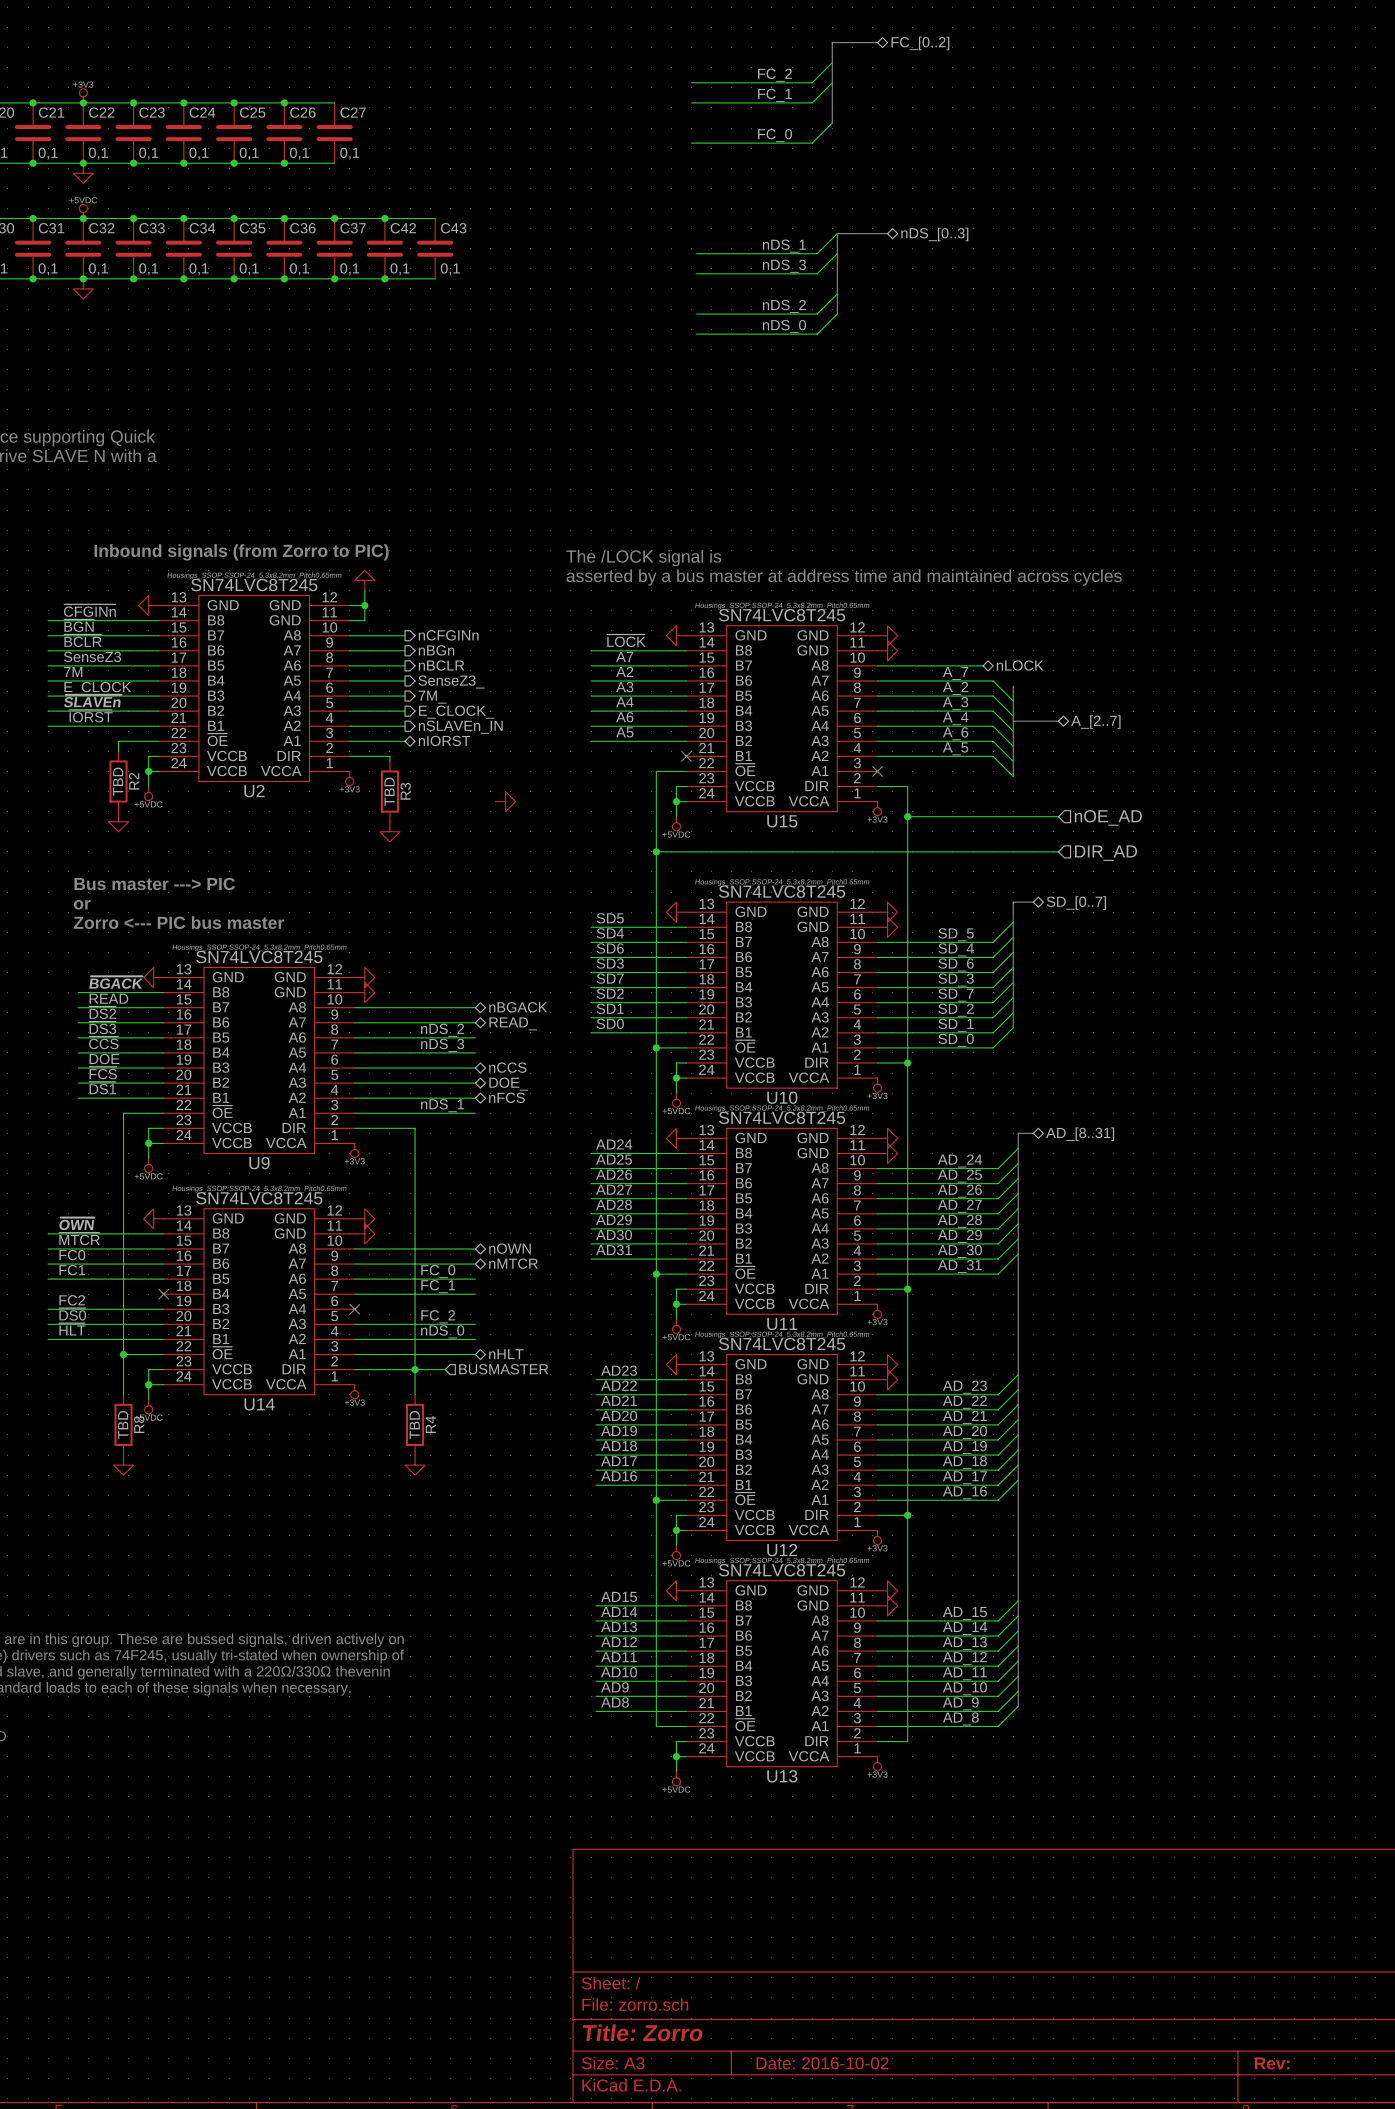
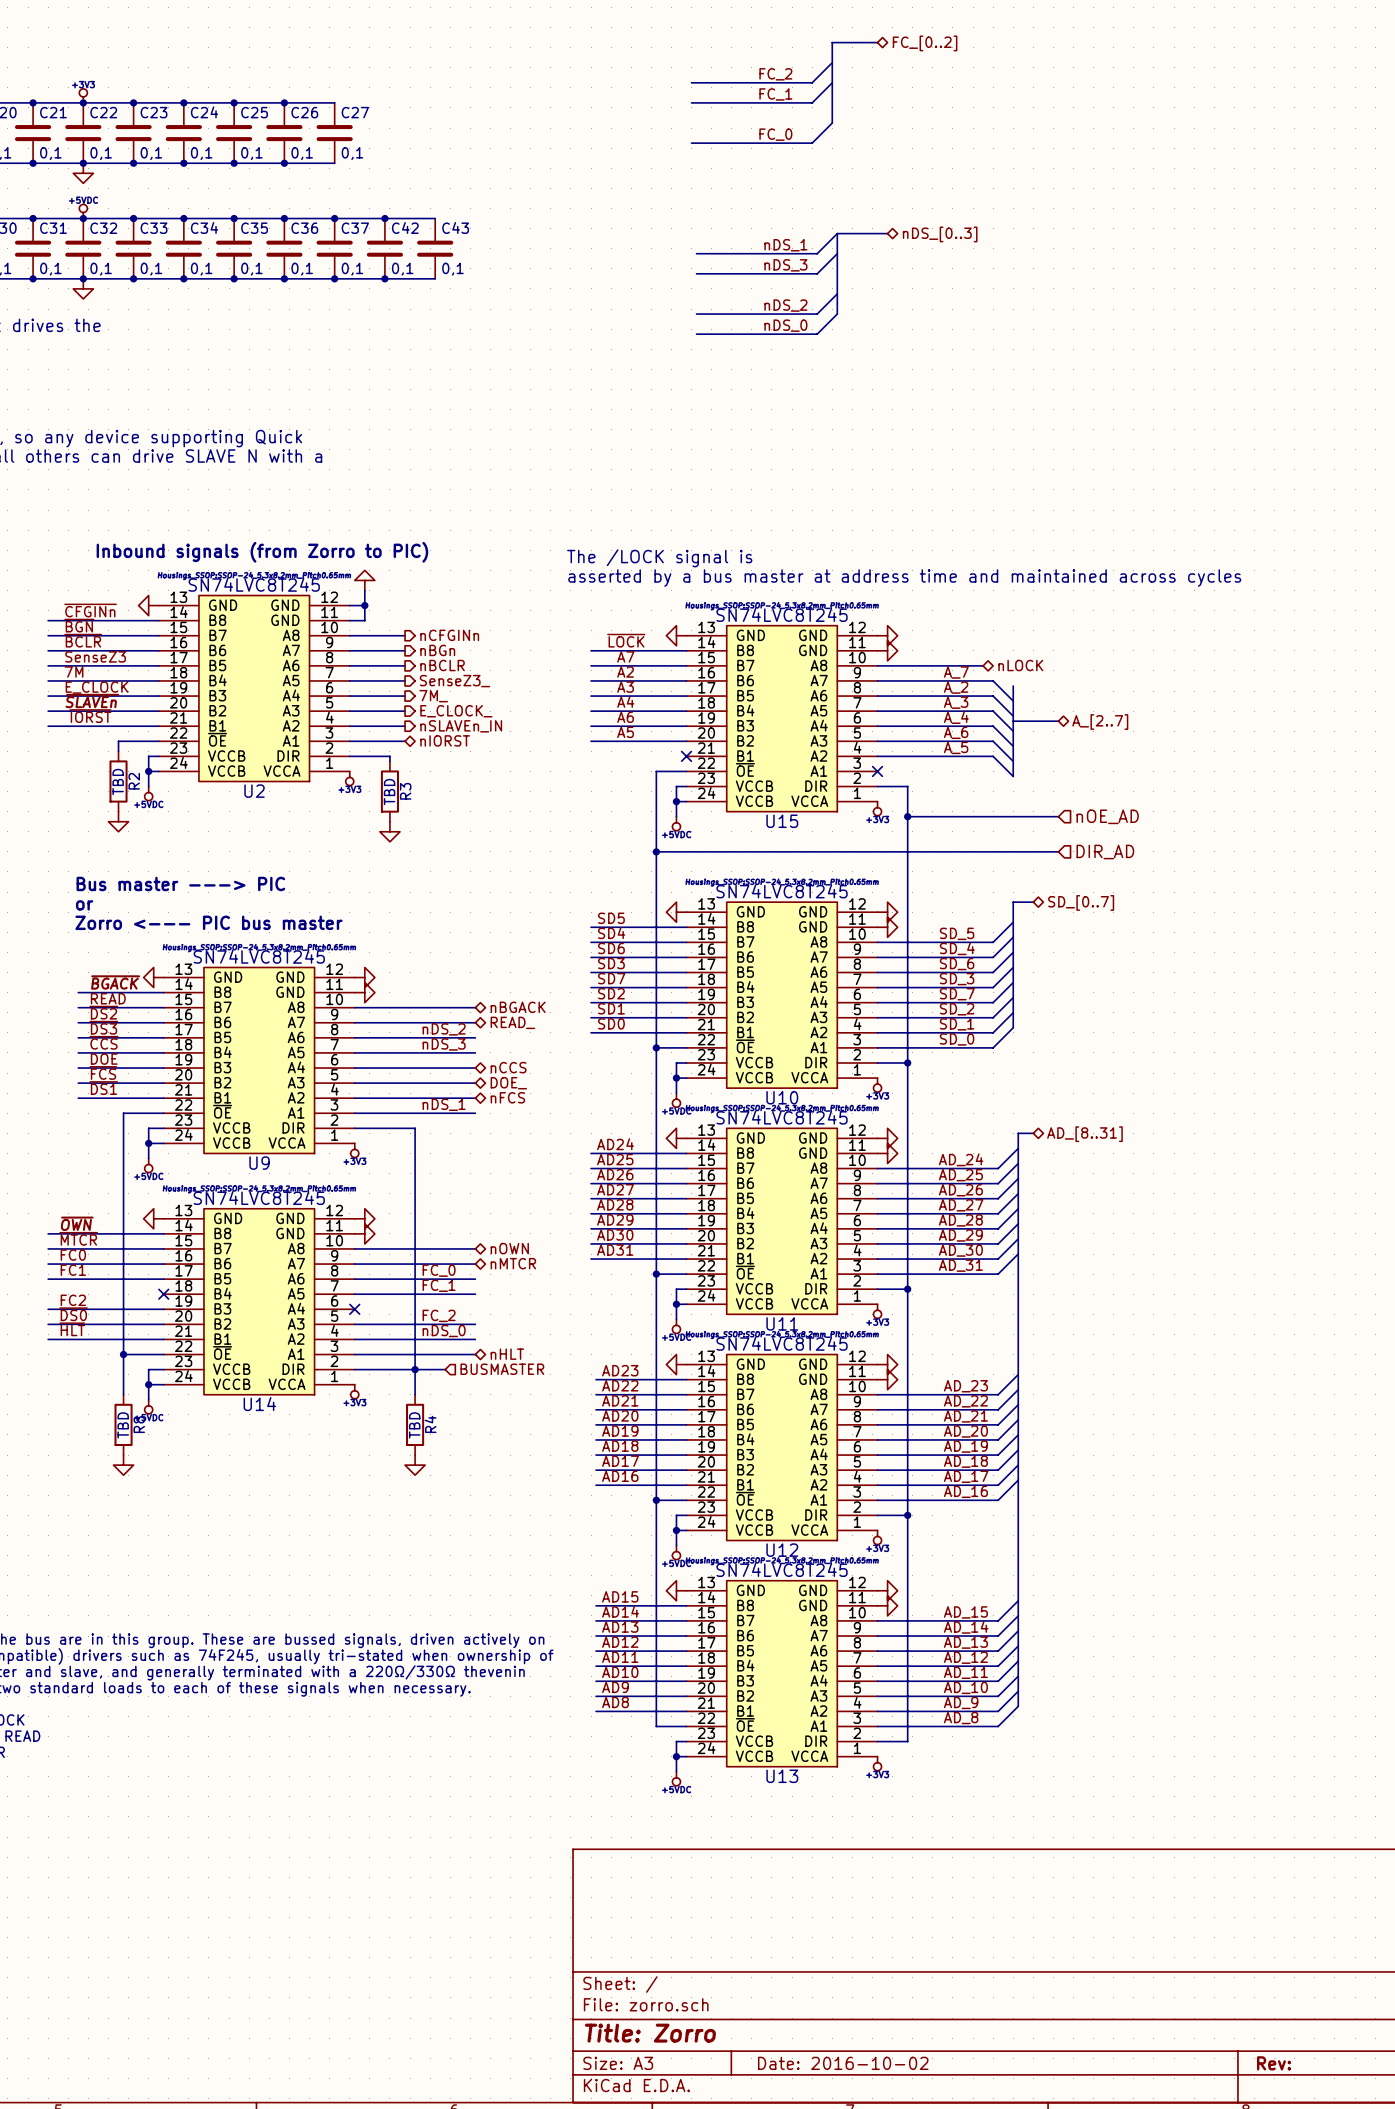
power symbol: (505, 801) -> none

